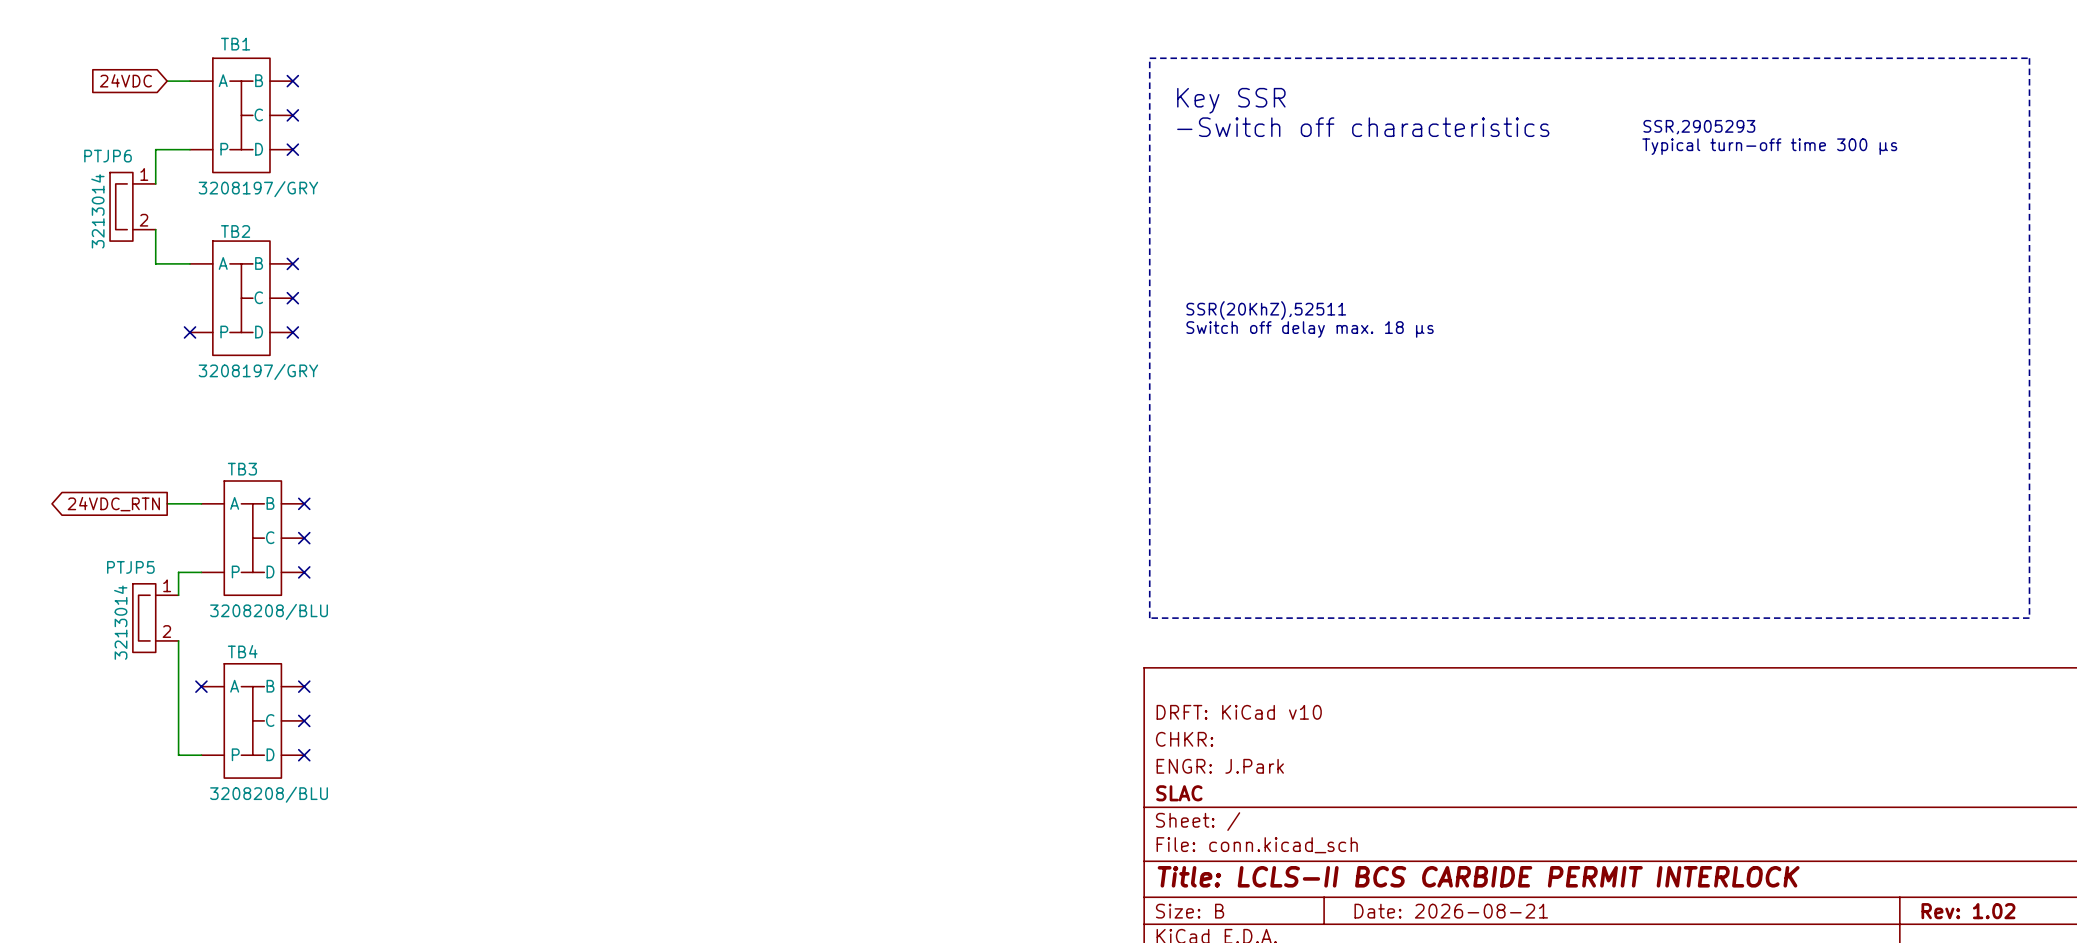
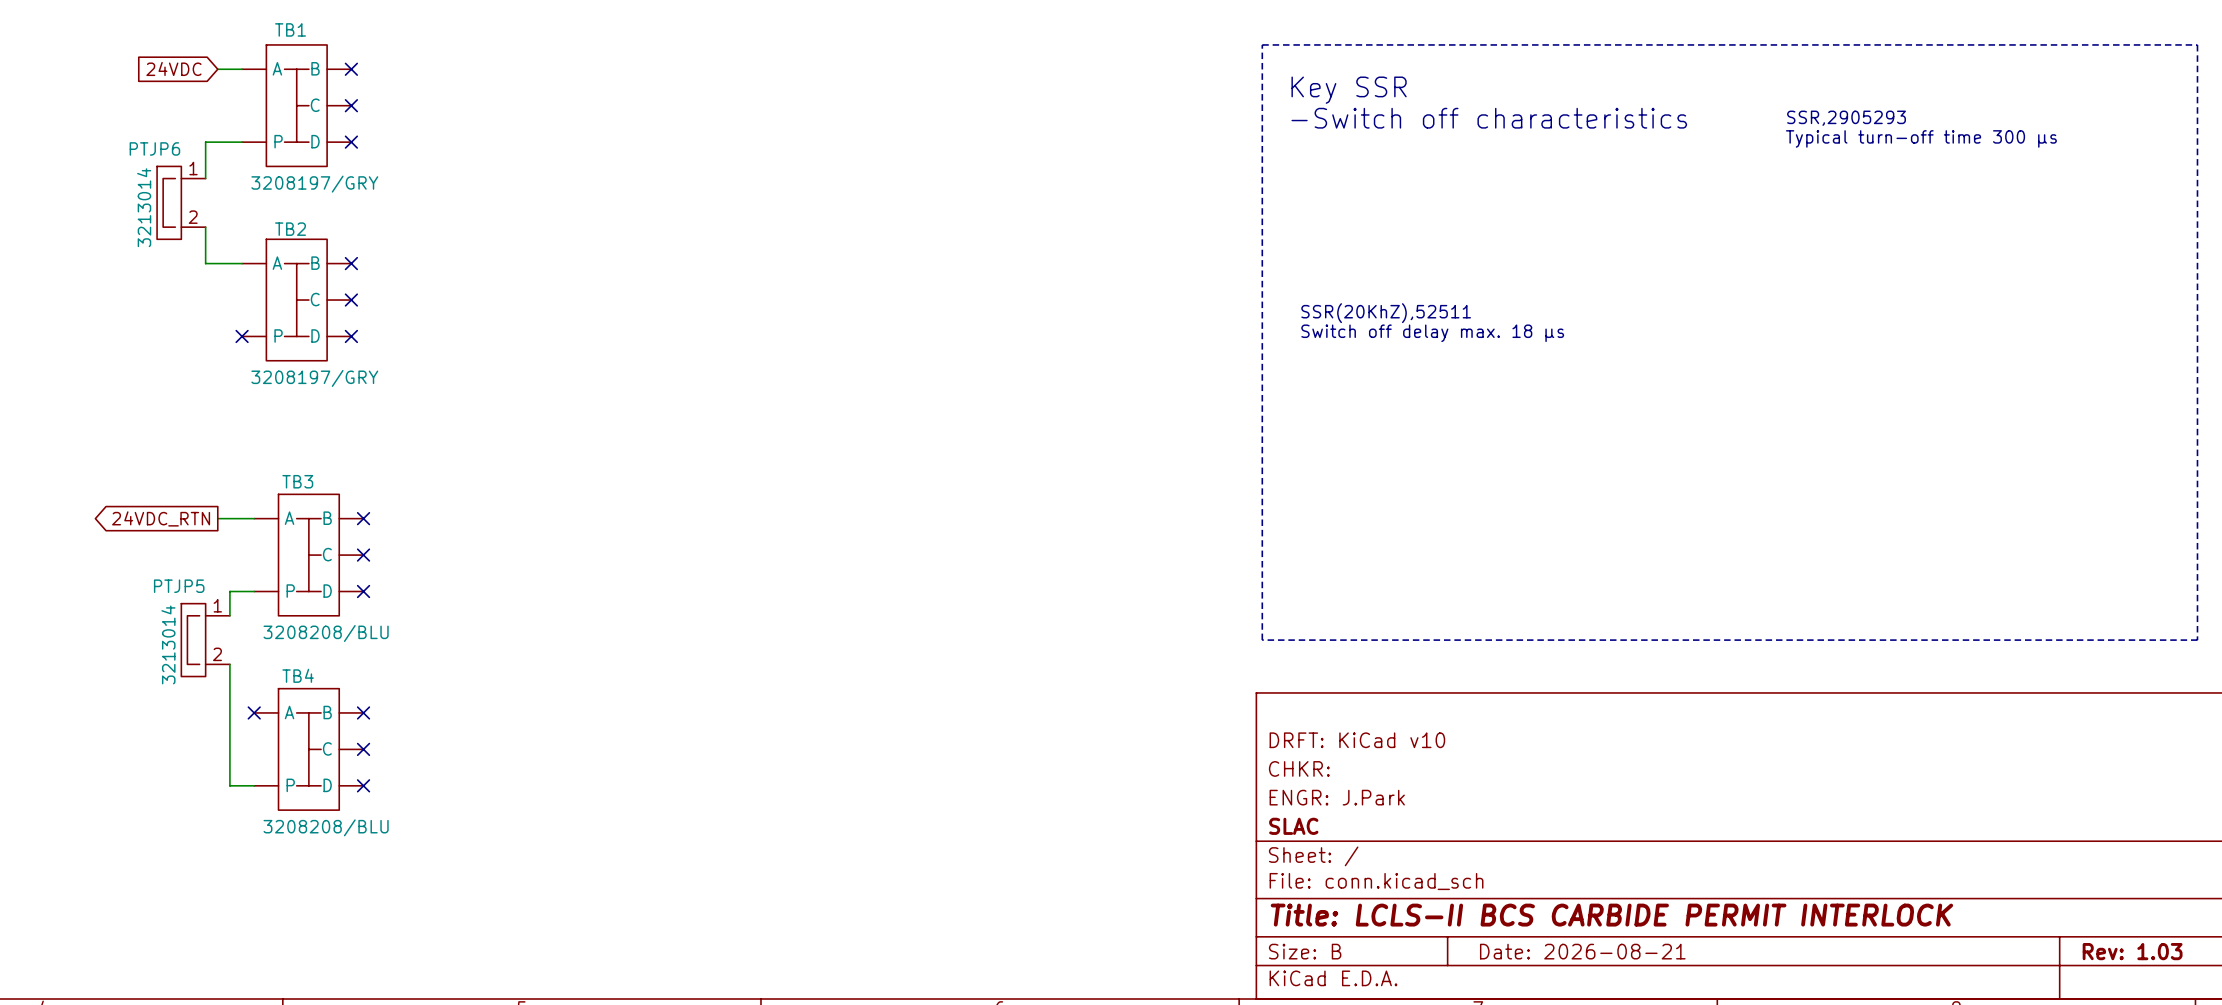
title block: Rev: 1.02 (1968, 911) -> Rev: 1.03 (2132, 951)

